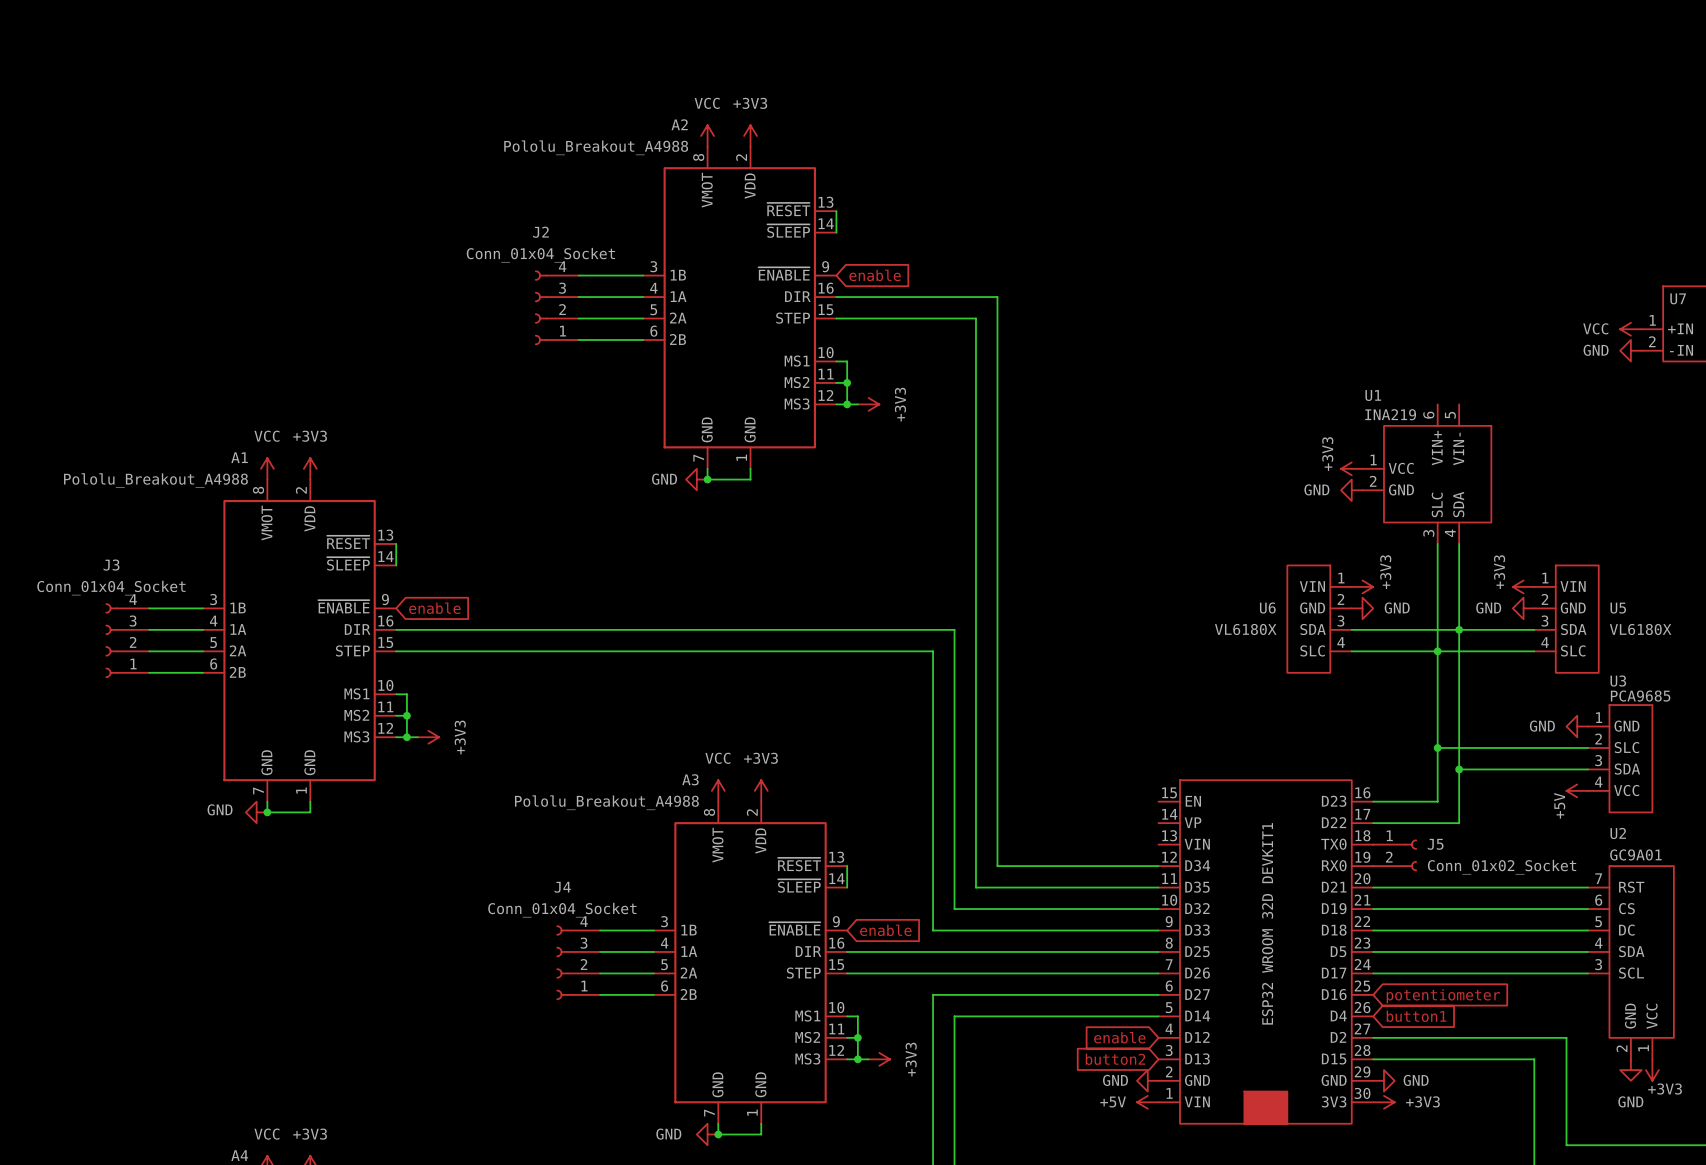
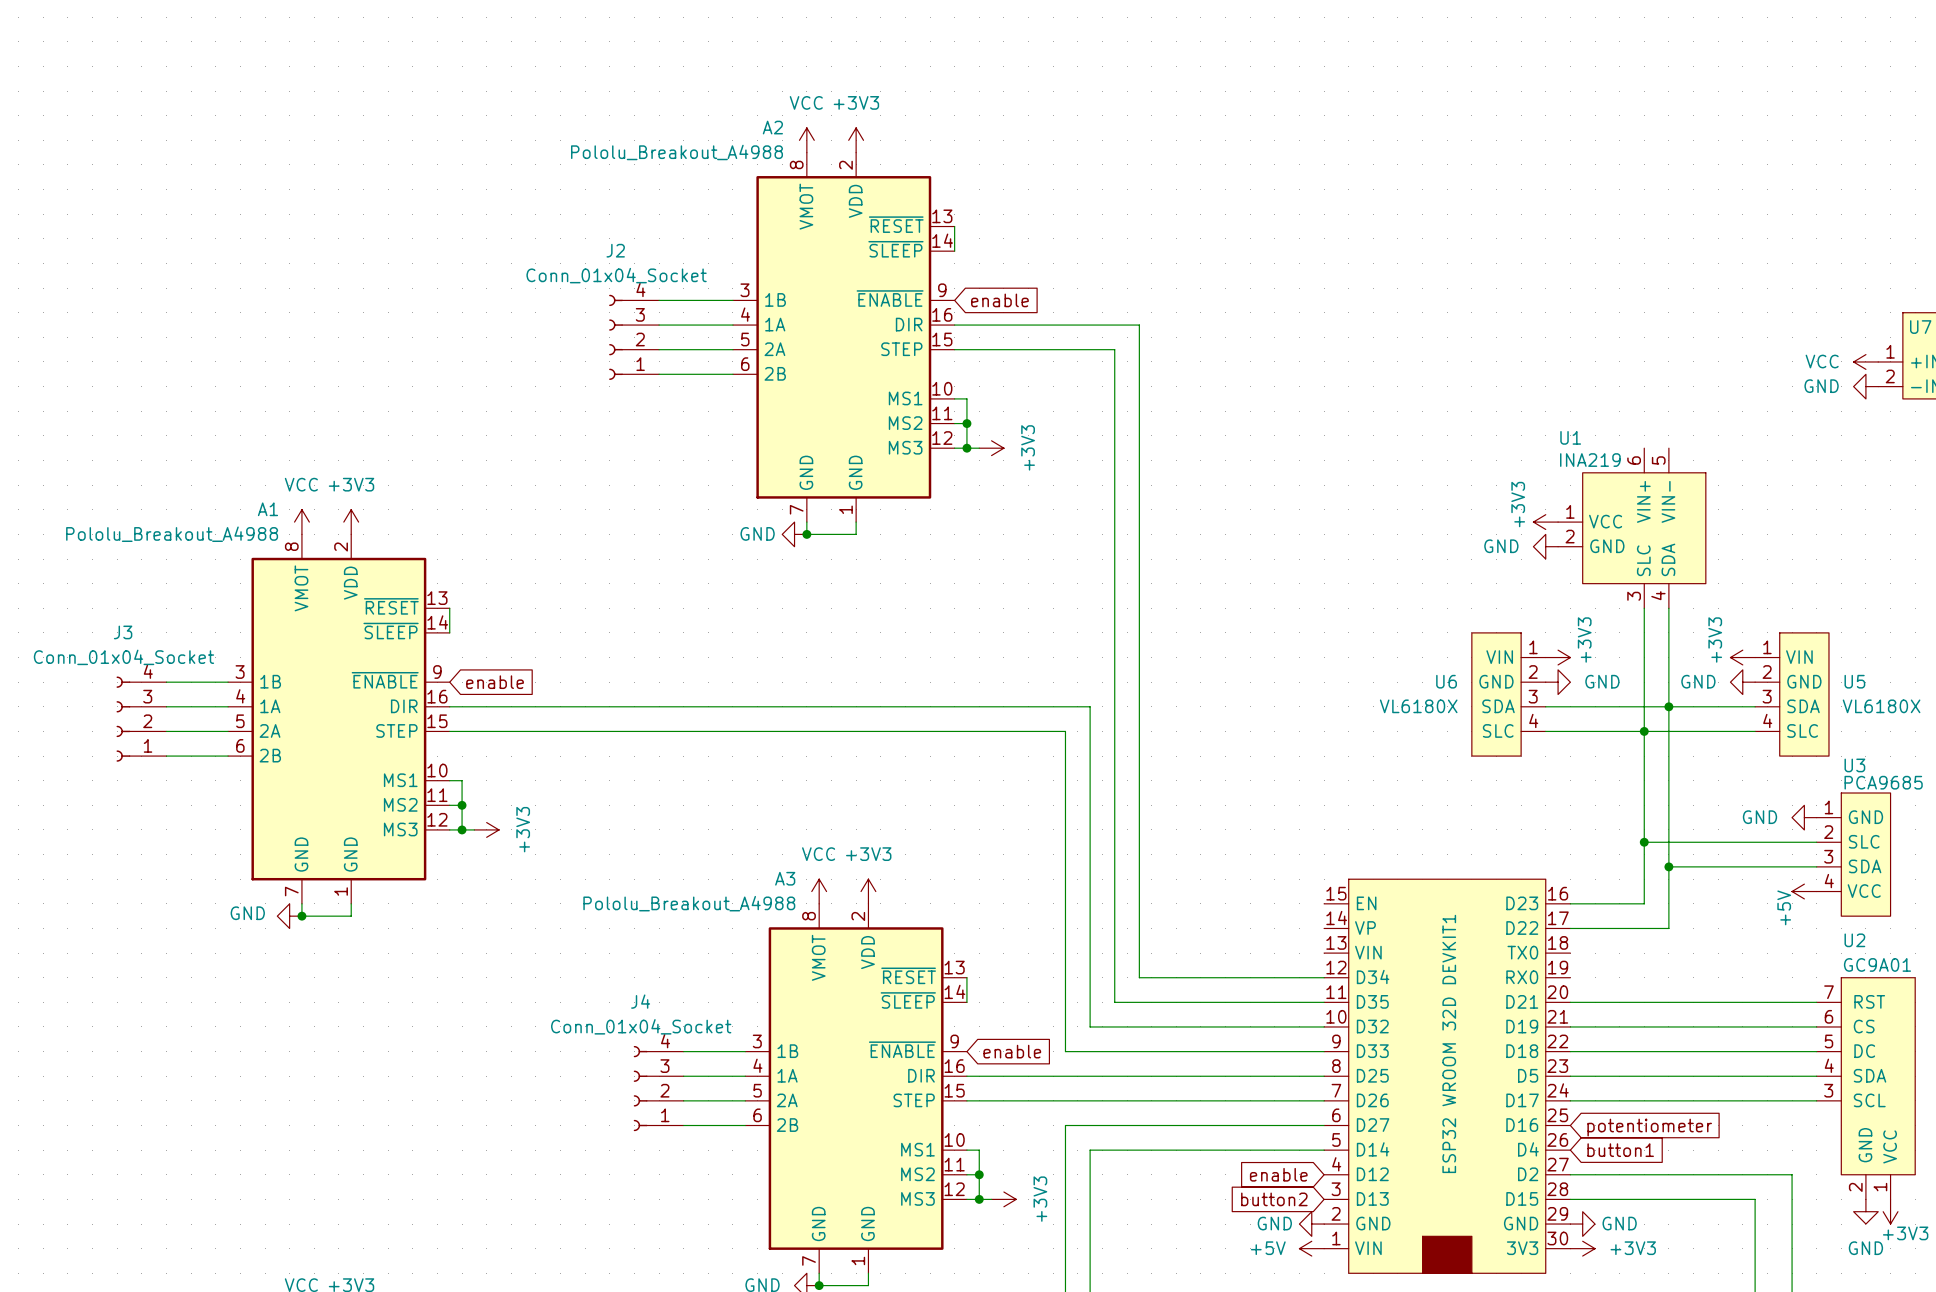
J5: Conn_01x02_Socket (1395, 855) -> none

